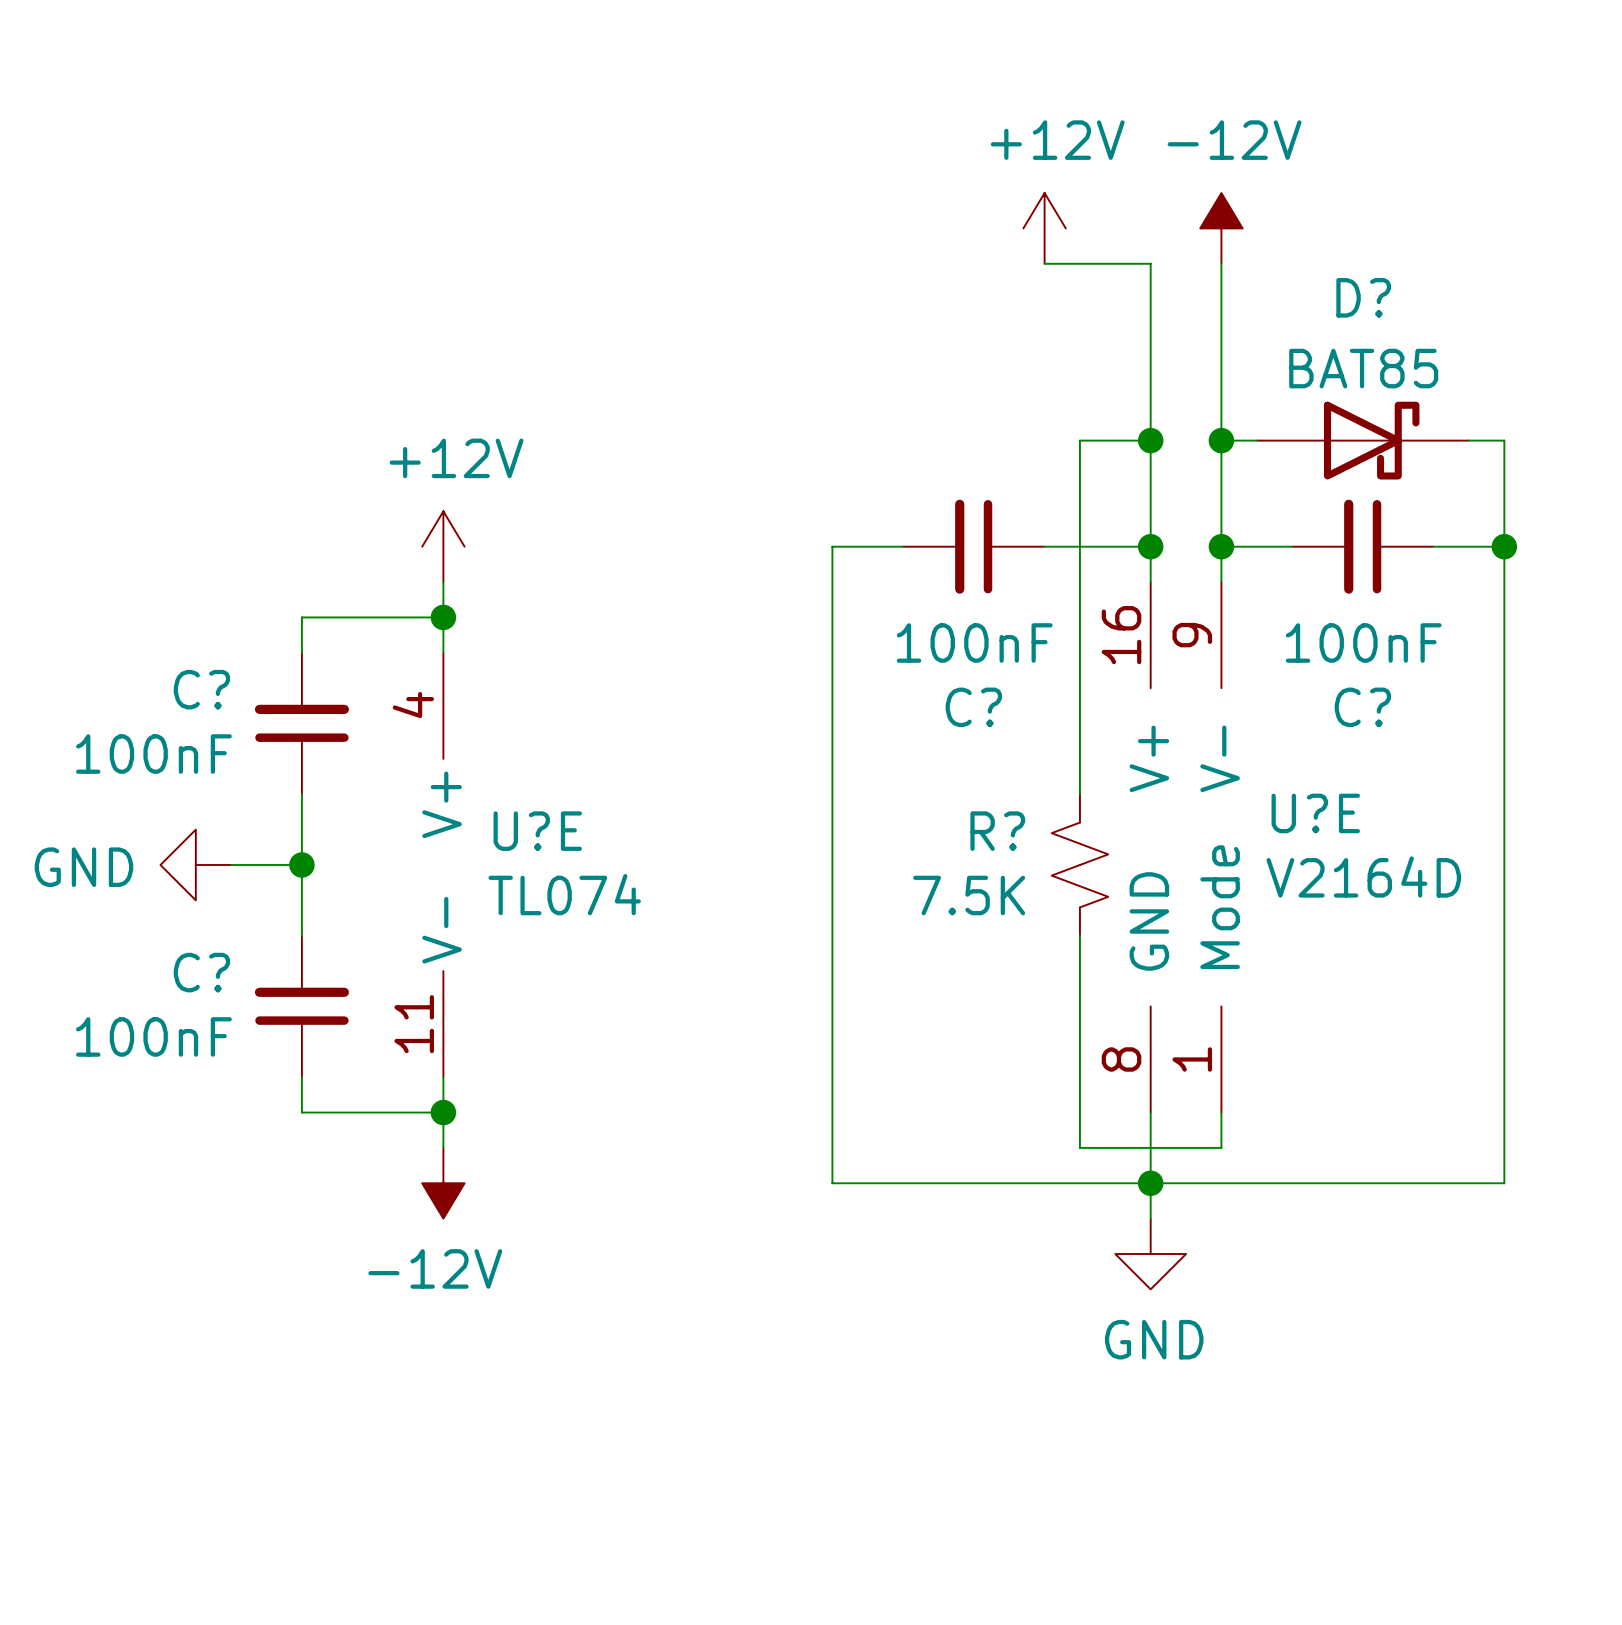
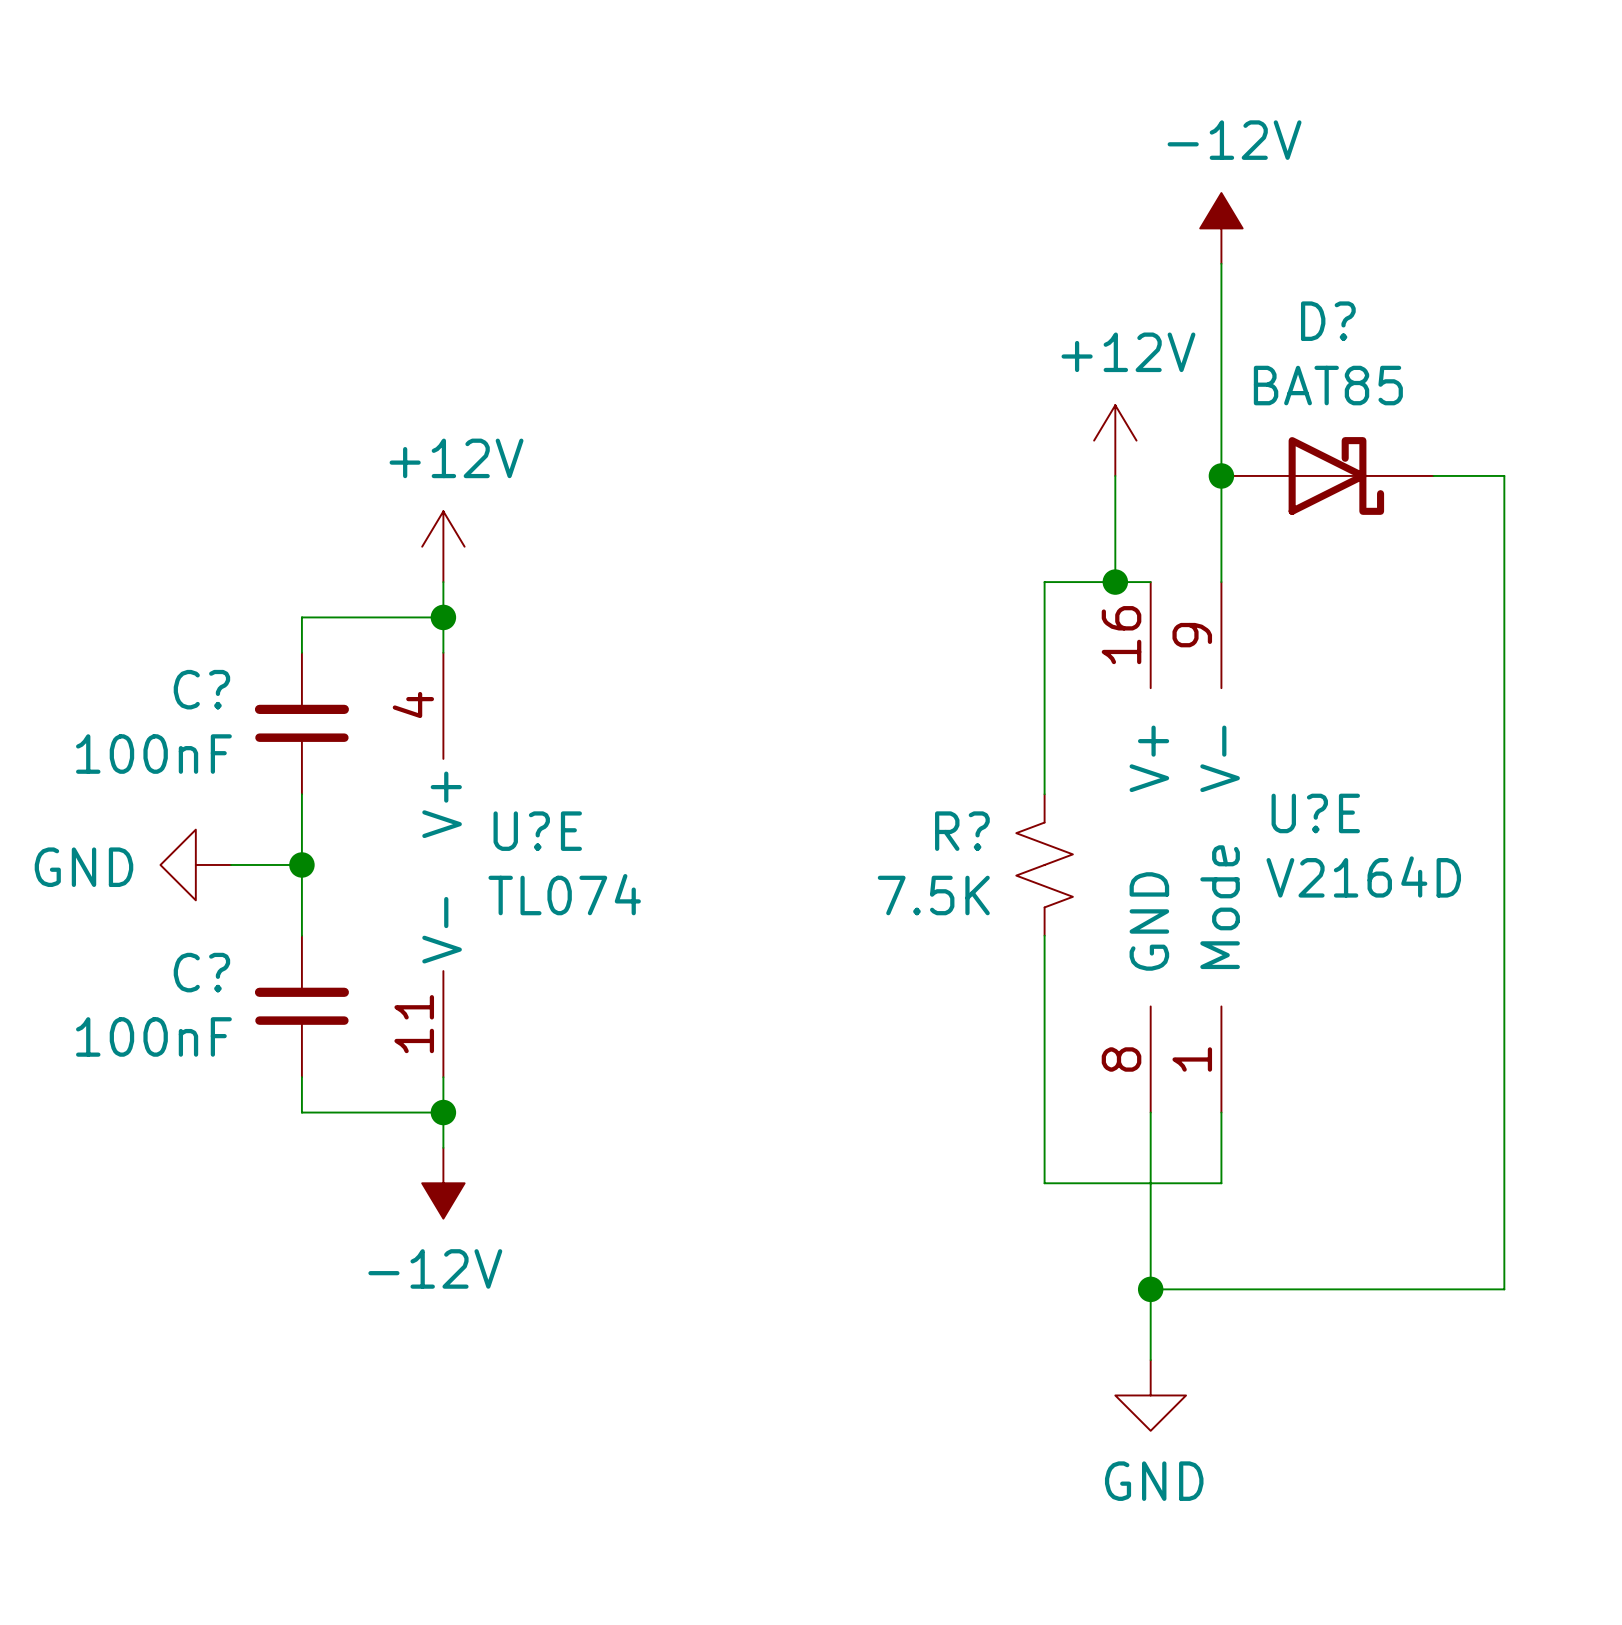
power symbol position: +12V (1044, 228) -> +12V (1115, 440)
wire: (1044, 263) (1150, 263) (1150, 582) -> (1044, 794) (1044, 582) (1150, 582)
wire: (1150, 440) (1079, 440) (1079, 794) -> none
junction: (1150, 440) -> none
wire: (1221, 440) (1256, 440) -> none
junction: (1221, 440) -> none
D?: BAT85 (1362, 440) -> none
wire: (1468, 440) (1504, 440) (1504, 475) -> (1433, 475) (1504, 475)
wire: none -> (1115, 475) (1115, 582)
junction: none -> (1221, 475)
D?: none -> BAT85 (1327, 475)
wire: (903, 546) (832, 546) (832, 1183) (1044, 1183) -> (1044, 935) (1044, 1183)
C?: 100nF (973, 546) -> none
wire: (1044, 546) (1150, 546) -> none
junction: (1150, 546) -> none
wire: (1221, 546) (1292, 546) -> none
junction: (1221, 546) -> none
C?: 100nF (1362, 546) -> none
wire: (1433, 546) (1504, 546) -> none
junction: (1504, 546) -> none
junction: none -> (1115, 582)
R? position: (1079, 864) -> (1044, 864)
wire: (1079, 935) (1079, 1147) (1221, 1147) -> (1221, 1183) (1221, 1147)
junction position: (1150, 1183) -> (1150, 1289)
wire: (1221, 1183) (1504, 1183) -> (1150, 1289) (1504, 1289) (1504, 1183)
wire: none -> (1150, 1218) (1150, 1360)
power symbol position: GND (1150, 1254) -> GND (1150, 1395)

